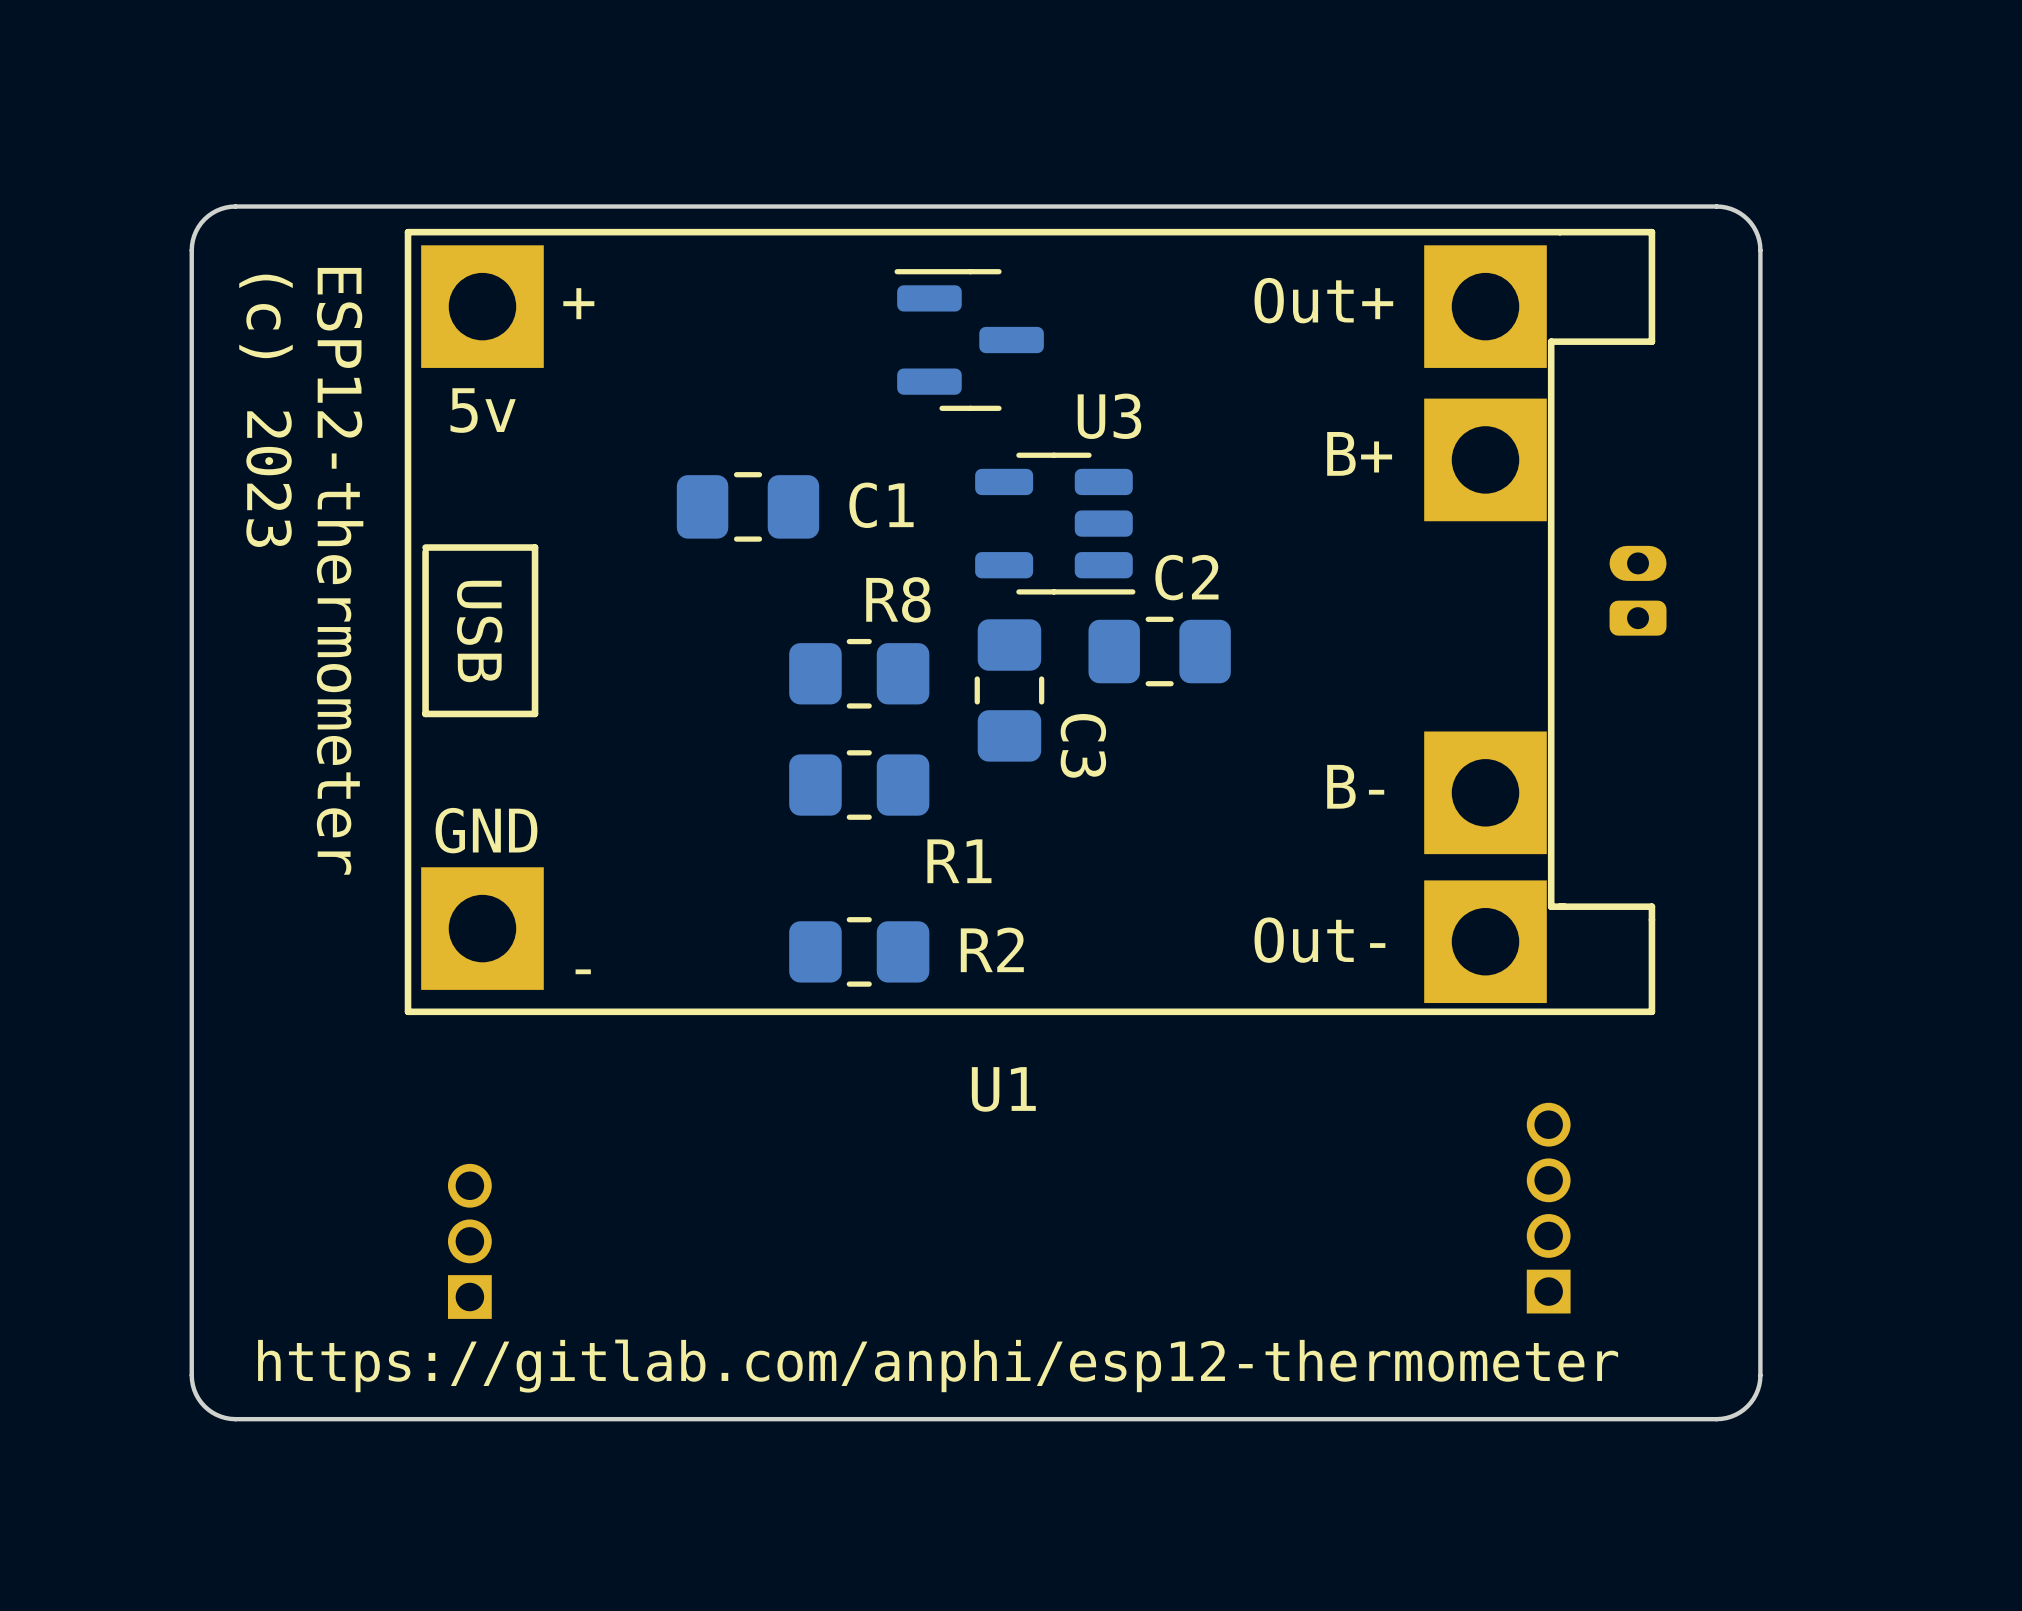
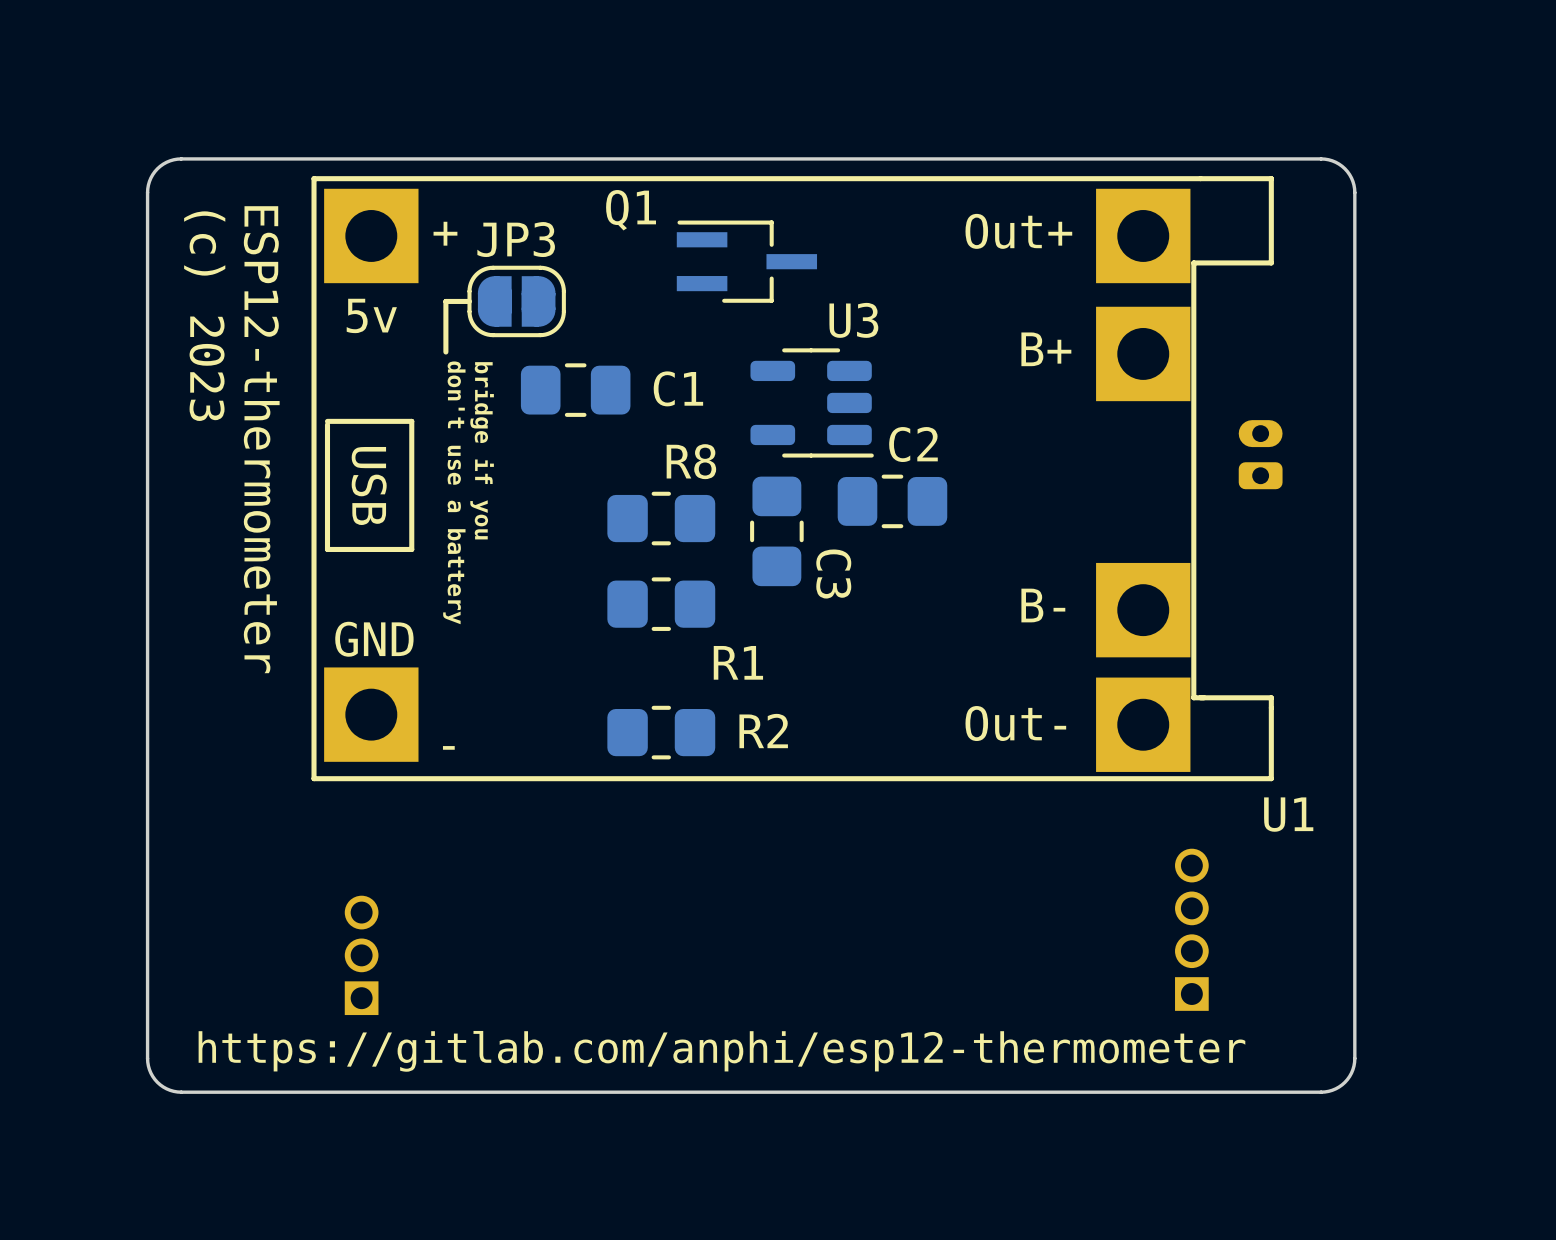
Q1: none -> (746, 261)
part: (969, 340) -> none
line: none -> (469, 301) (445, 301) (445, 352)
JP3: none -> (516, 301)
text: none -> bridge if you (482, 450)
text: none -> don't use a battery (454, 492)
U1 name position: U1 (1003, 1089) -> U1 (1288, 814)

